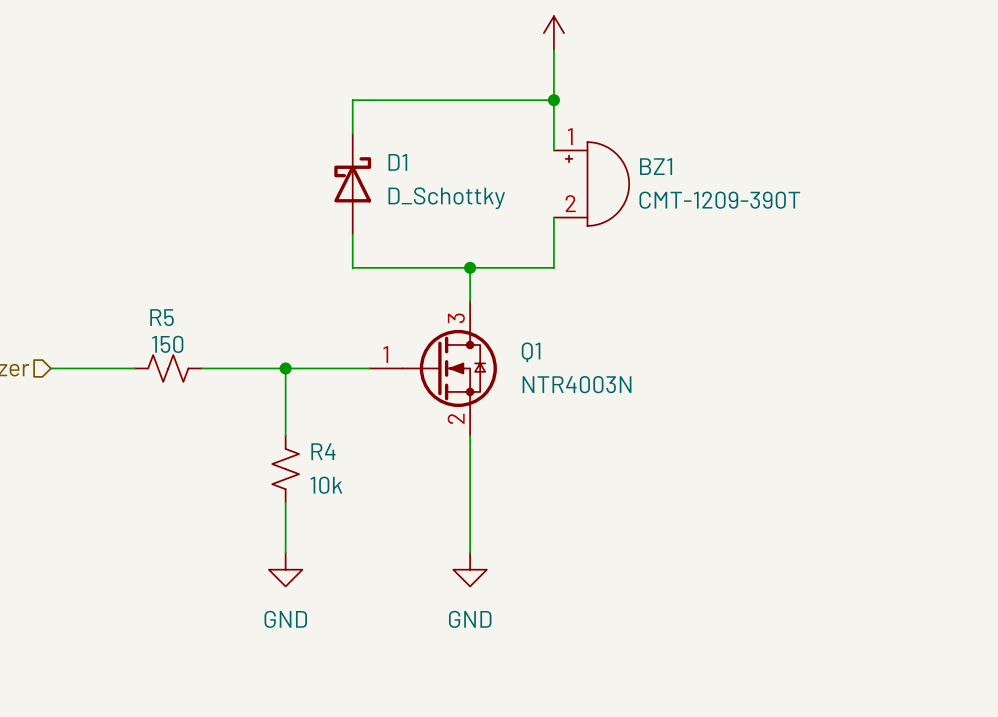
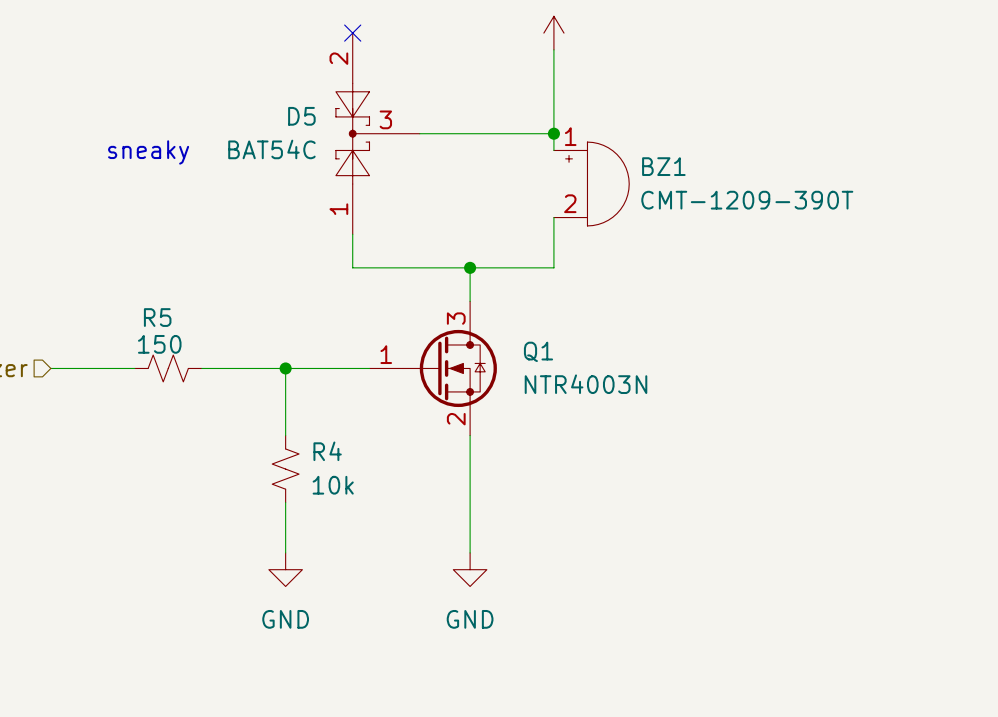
no-connect mark: none -> (352, 33)
wire: (553, 100) (352, 100) (352, 133) -> none
junction position: (553, 100) -> (553, 133)
D5: none -> BAT54C (377, 133)
wire: none -> (419, 133) (553, 133)
text: none -> sneaky (148, 152)
D1: D_Schottky (352, 184) -> none

